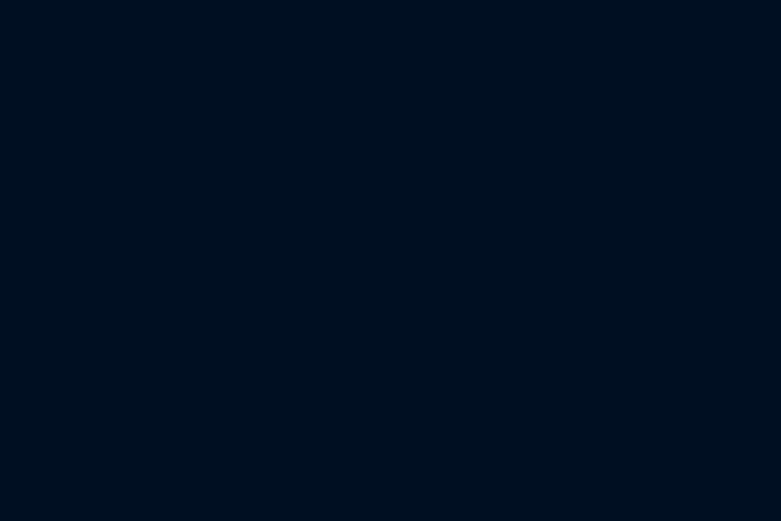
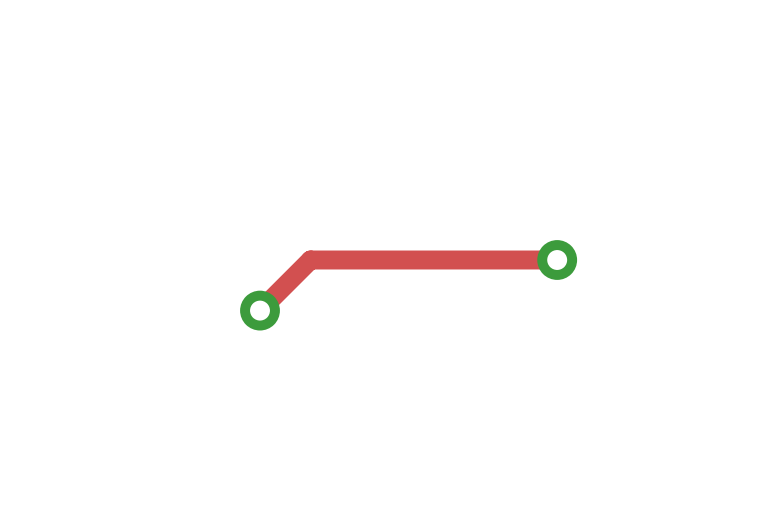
track: none -> (557, 260) (310, 260) (260, 310)
via: none -> (557, 260)
via: none -> (260, 310)

